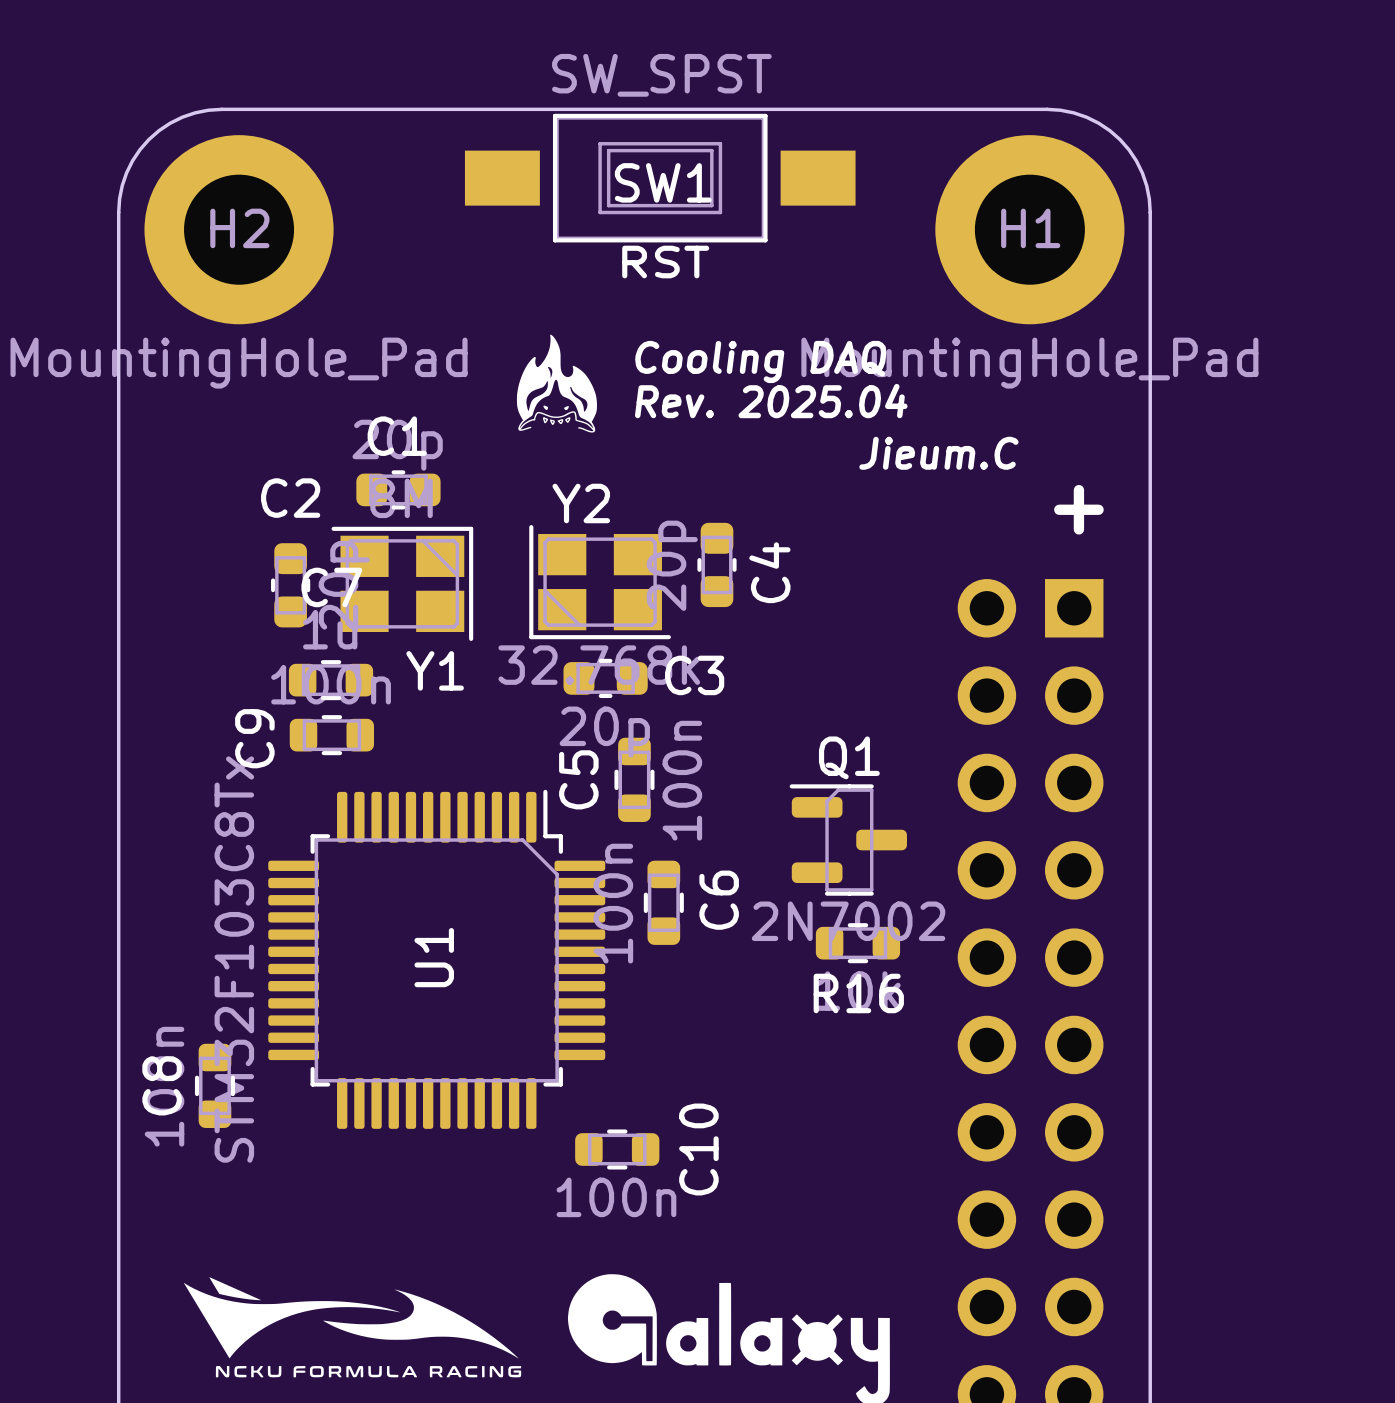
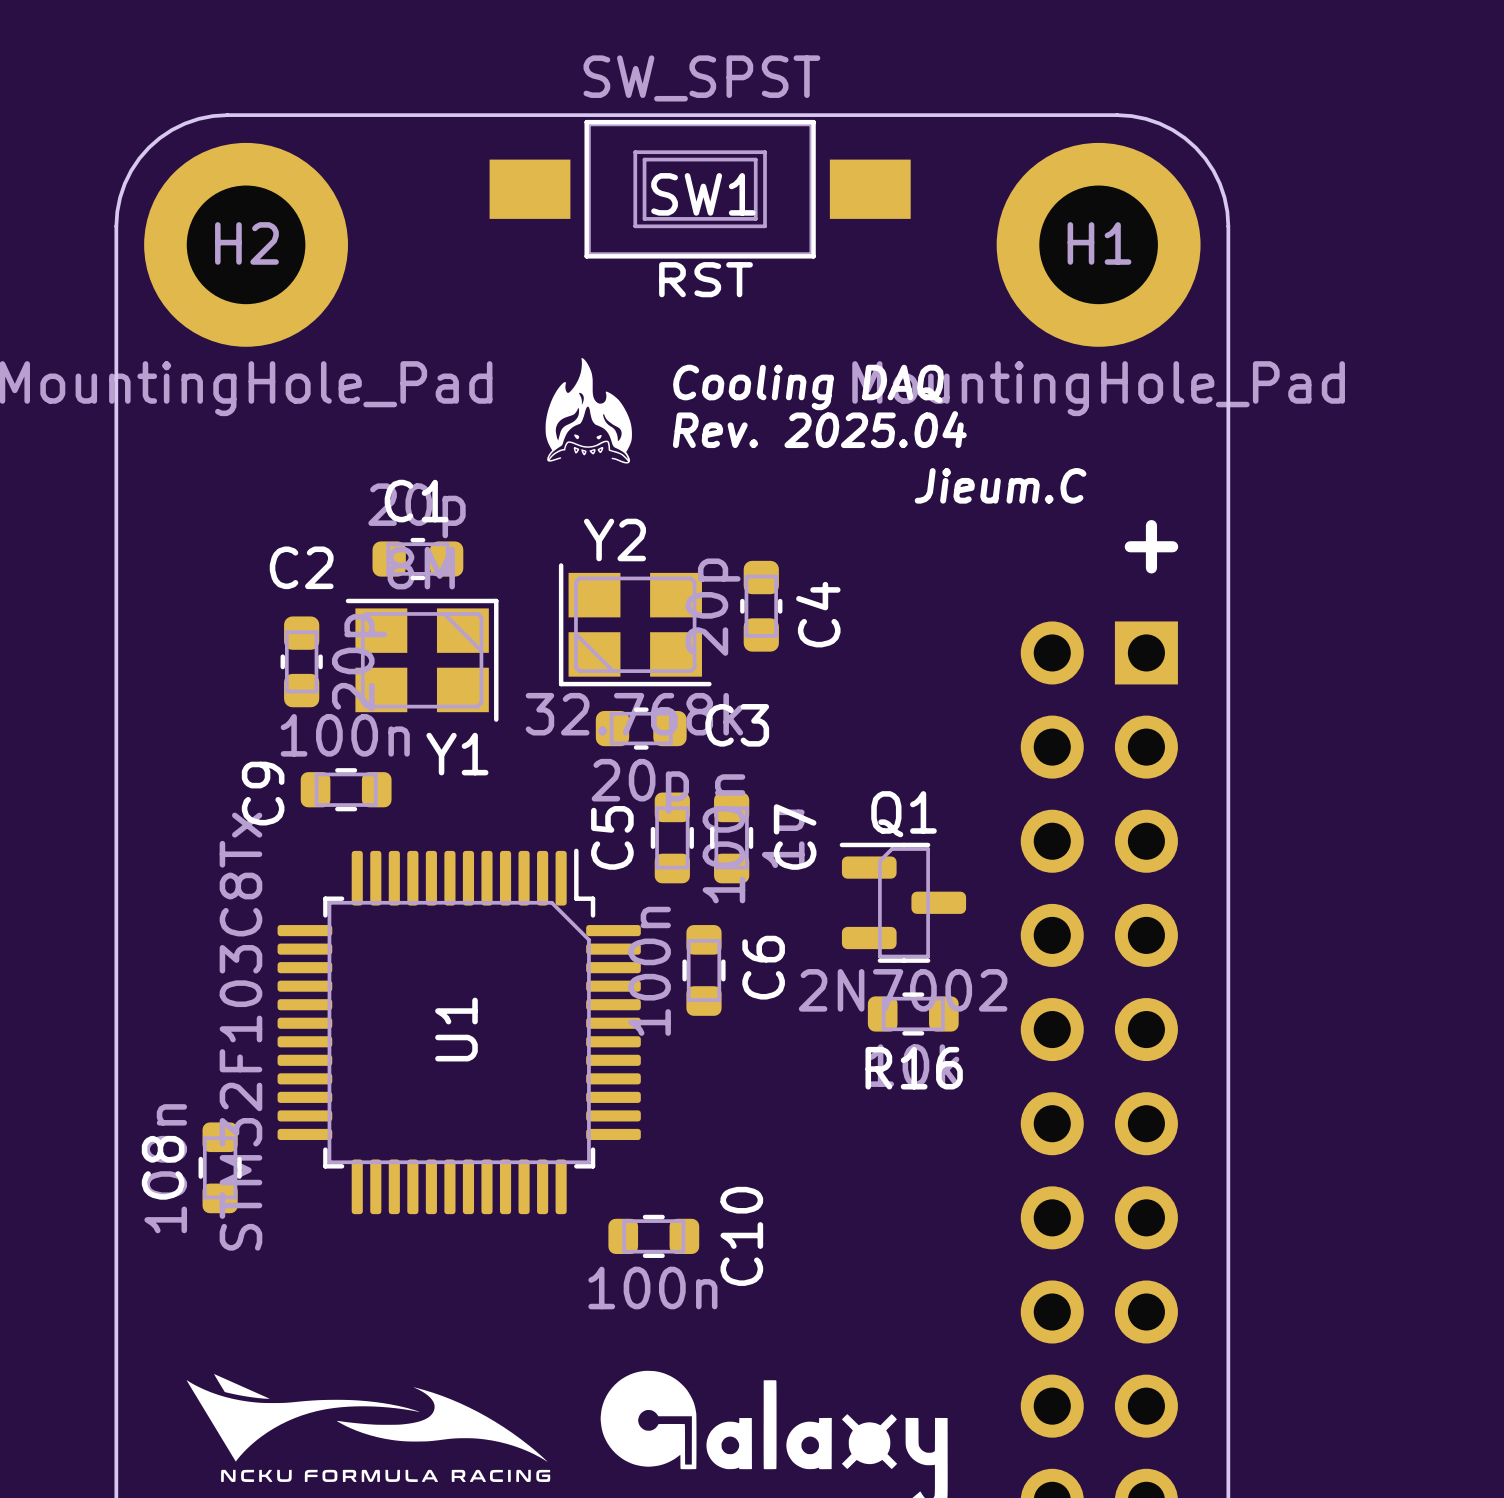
C1 position: (398, 489) -> (417, 559)
Y1 position: (402, 583) -> (422, 660)
C2 position: (290, 585) -> (301, 661)
C7 rotation: 0° (331, 680) -> 90° clockwise (731, 837)
C7 position: (331, 680) -> (731, 837)

